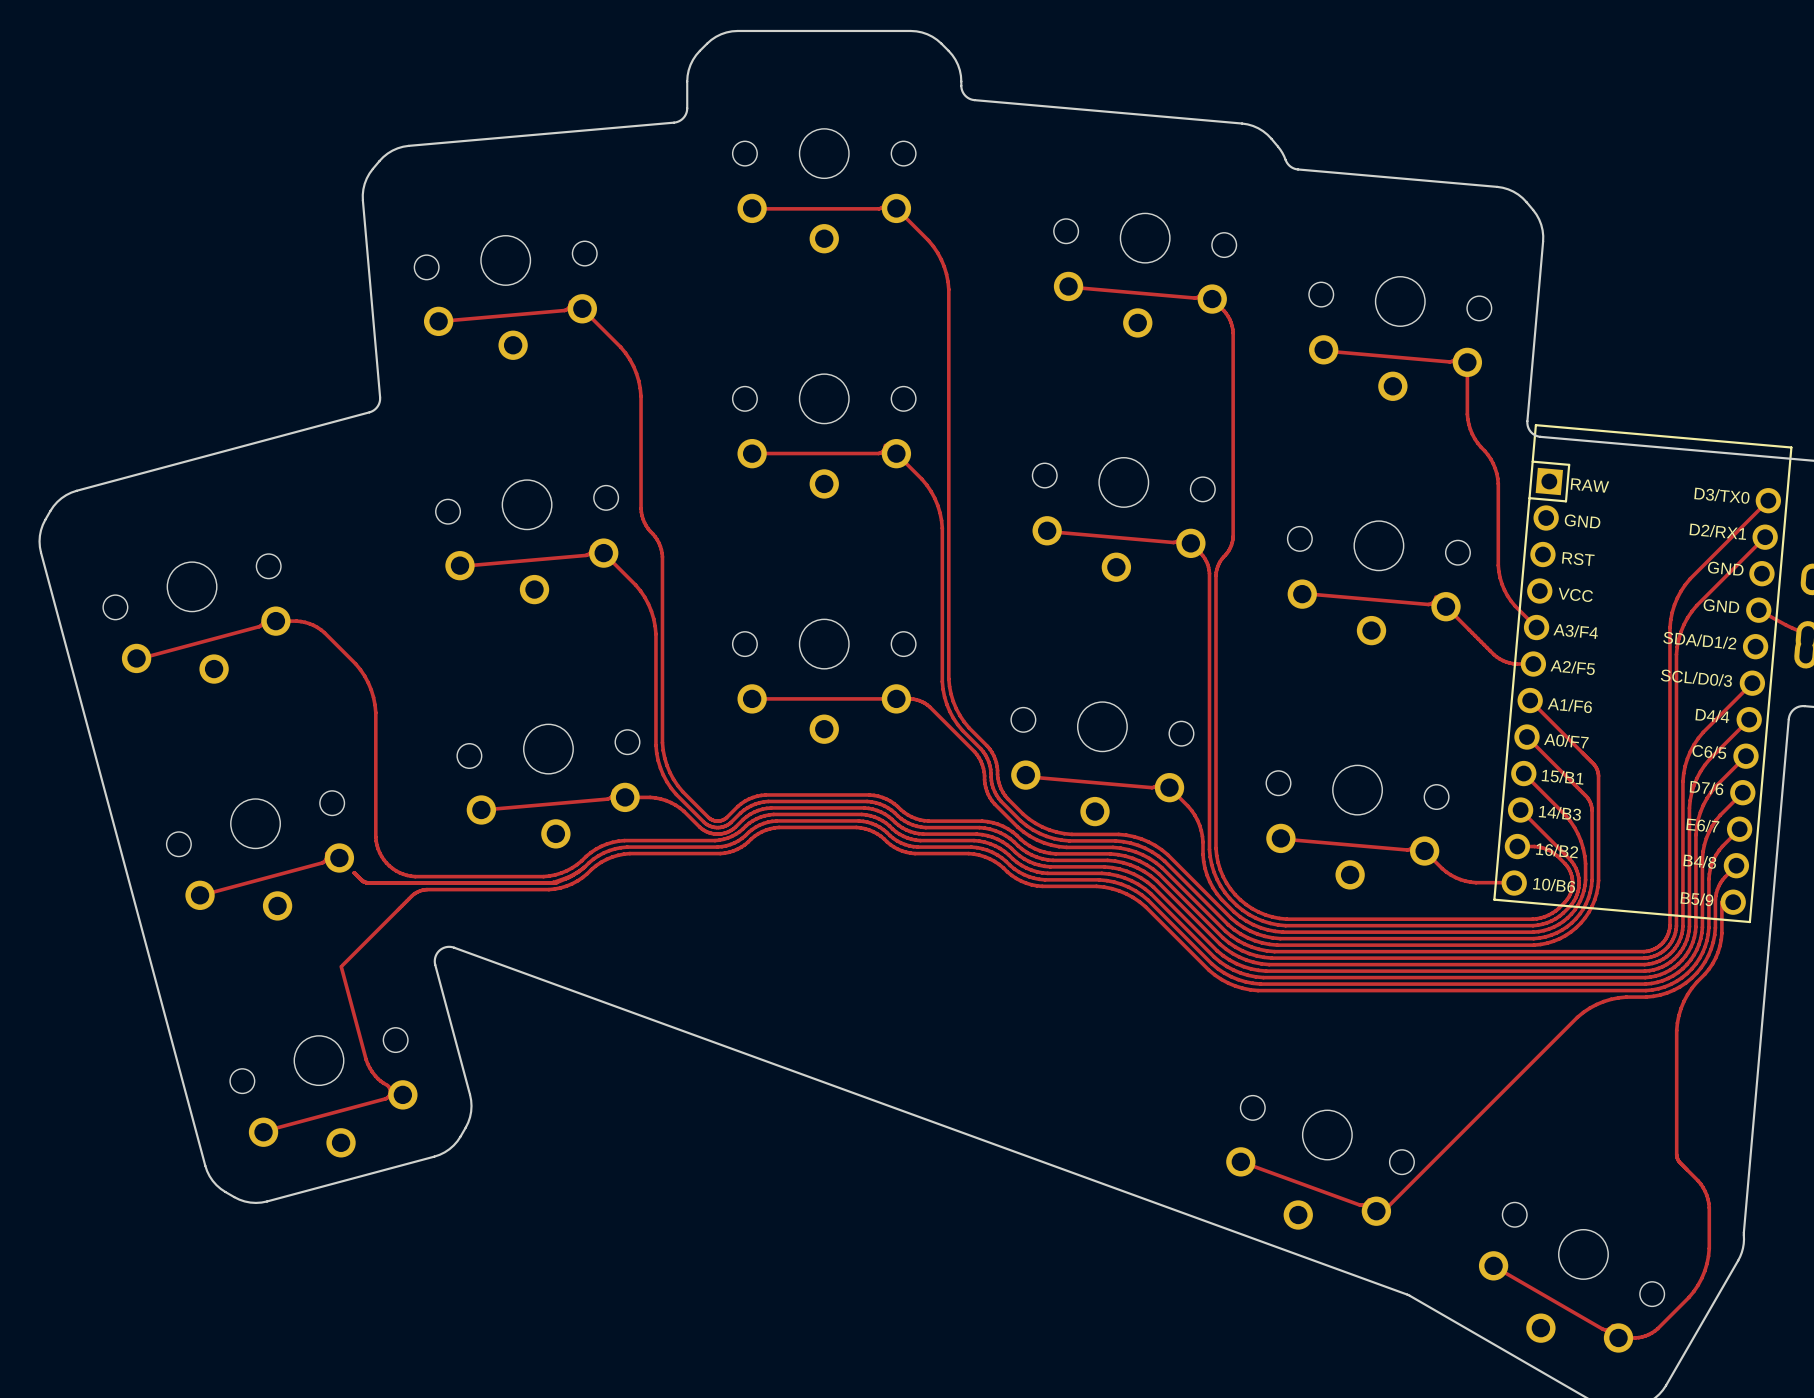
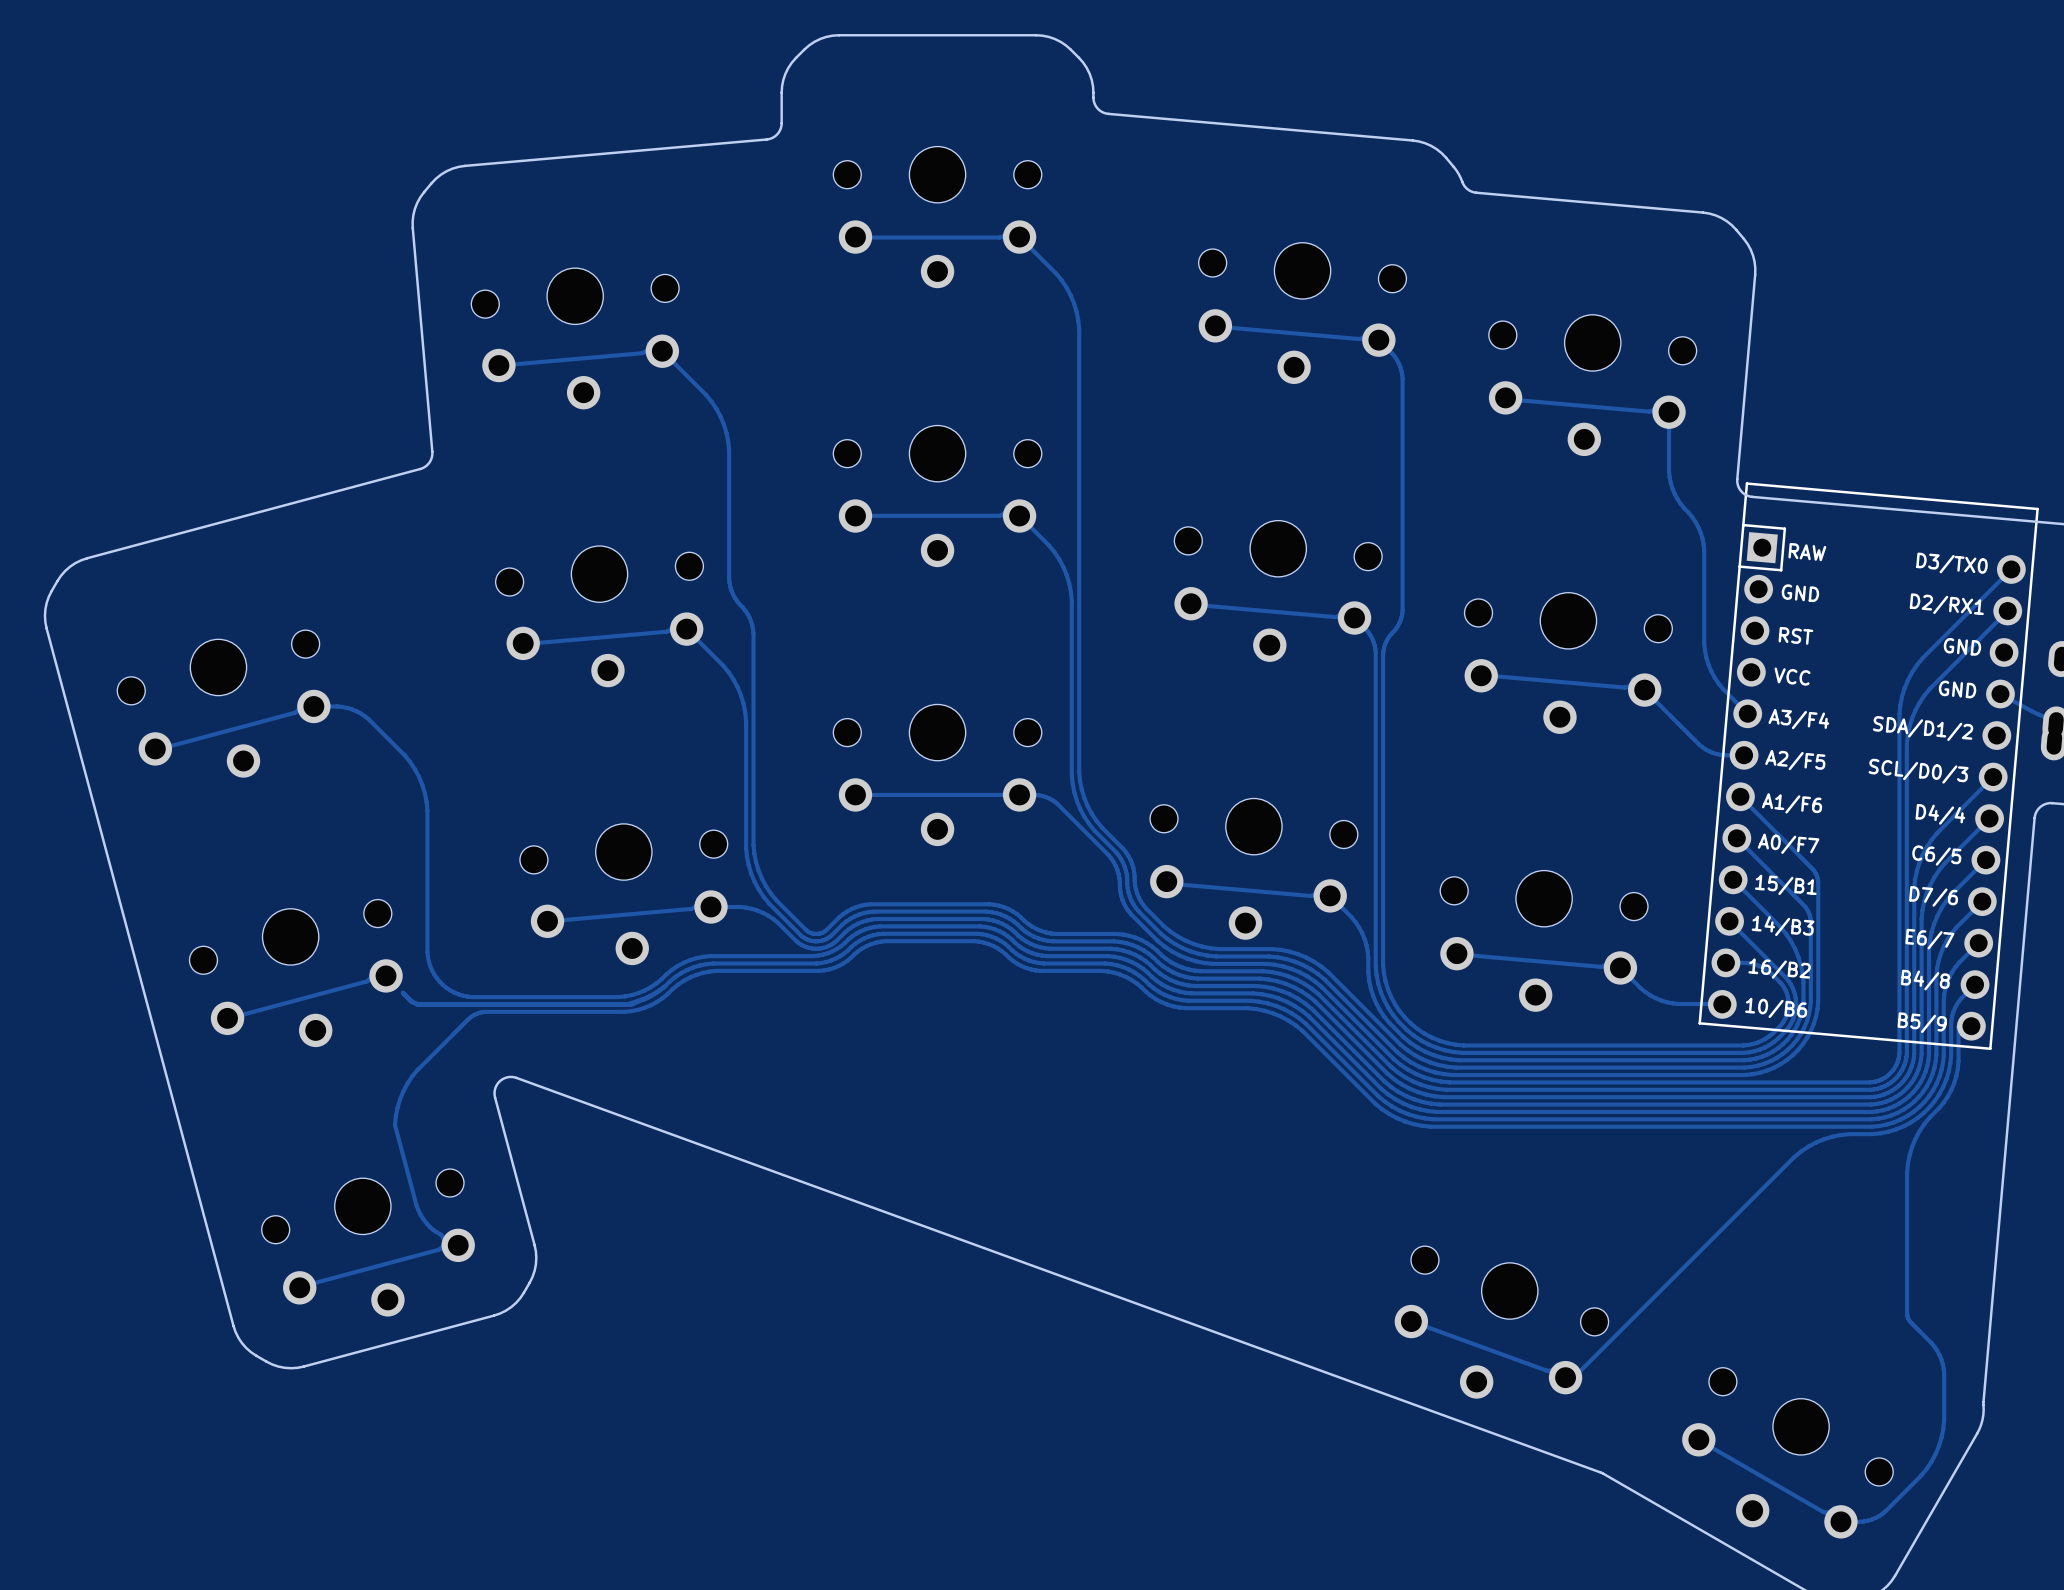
track: (366, 940) (342, 965) -> none
track: (341, 966) (347, 989) -> (418, 1069) (407, 1083) (400, 1099) (394, 1124)

